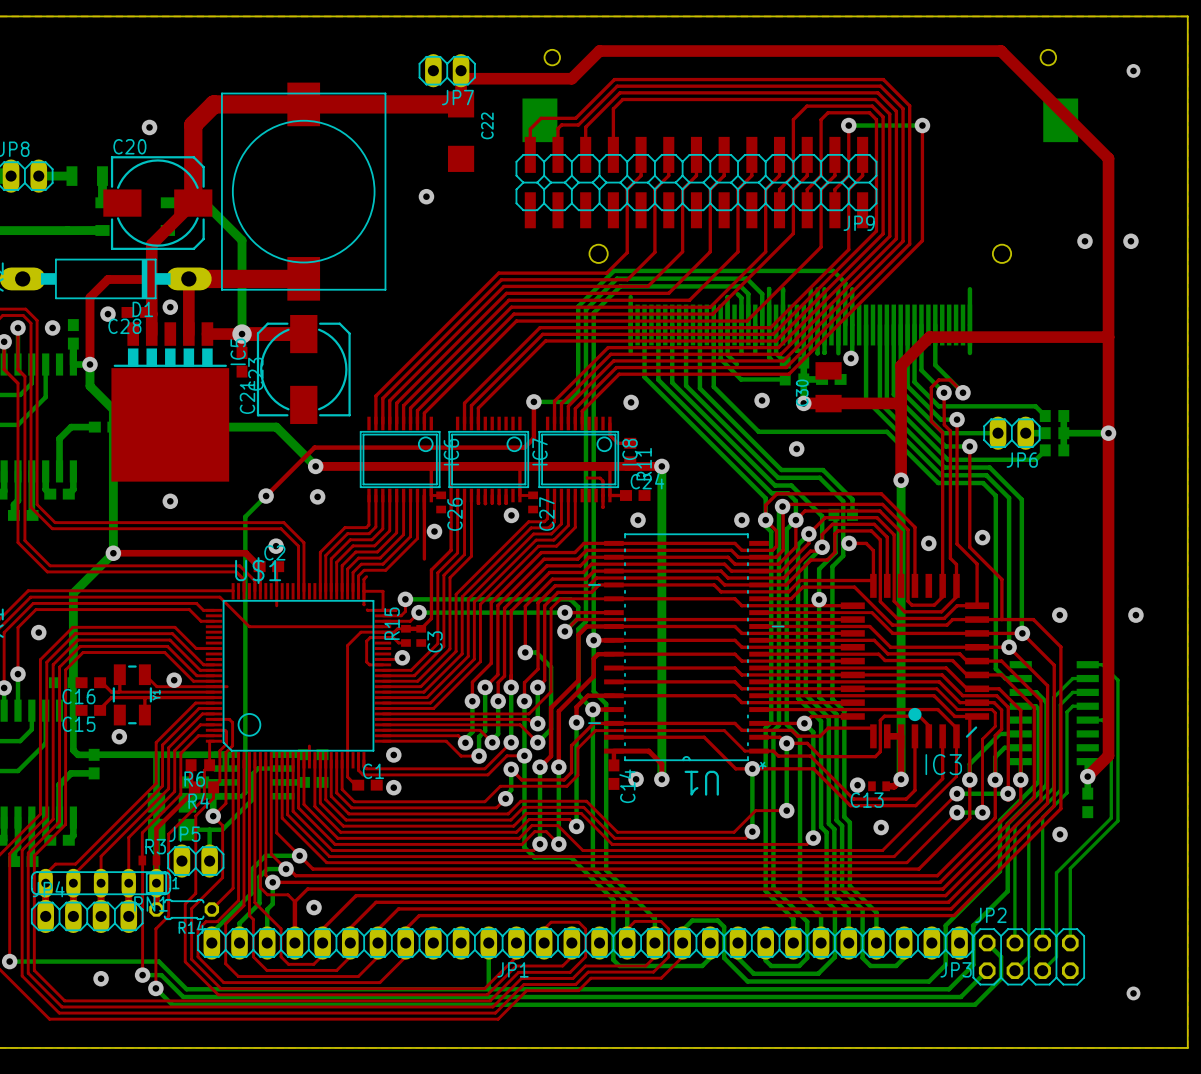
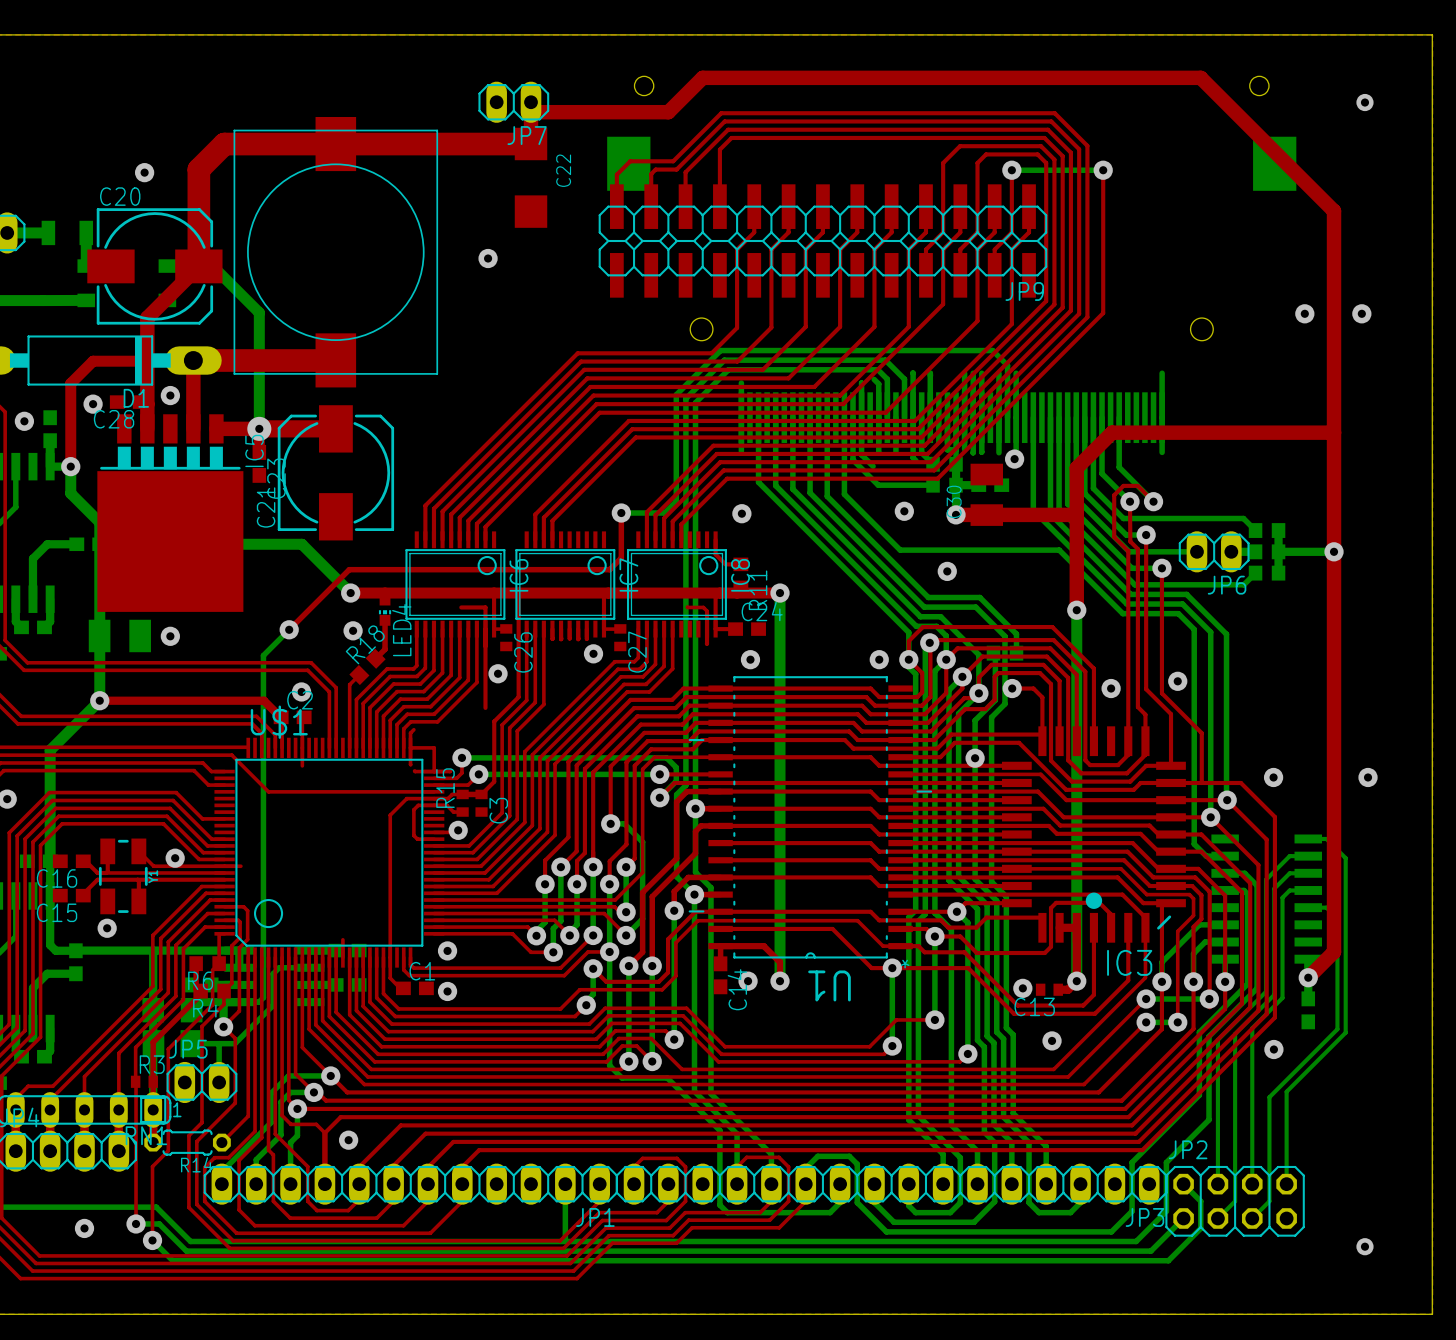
top track: none -> (461, 607) (485, 607) (485, 629)
LED4: none -> (385, 610)
top track: none -> (385, 620) (385, 649) (375, 658)
part: none -> (119, 635)
R18: none -> (367, 666)
top track: none -> (359, 675) (349, 684) (349, 747)

